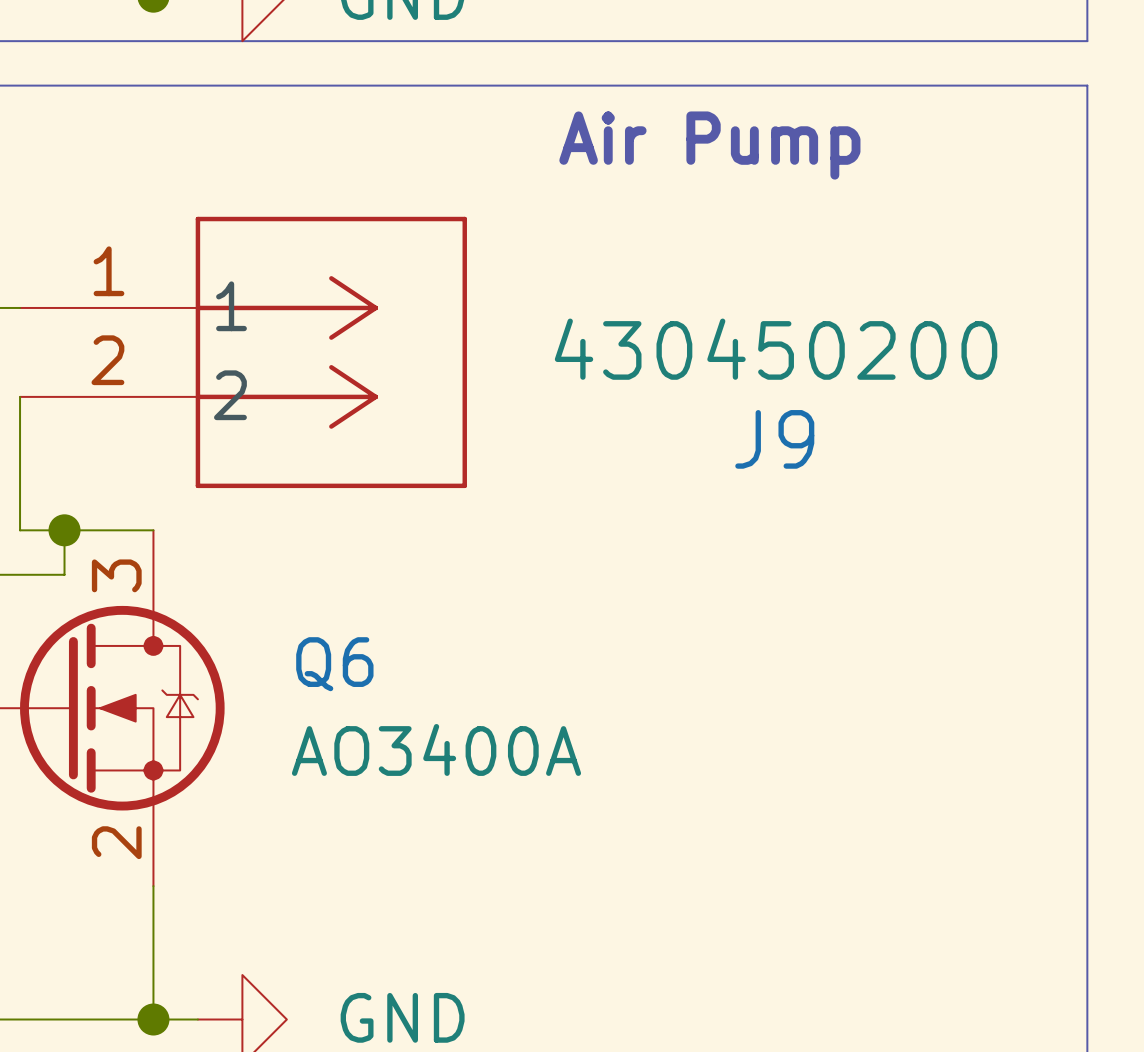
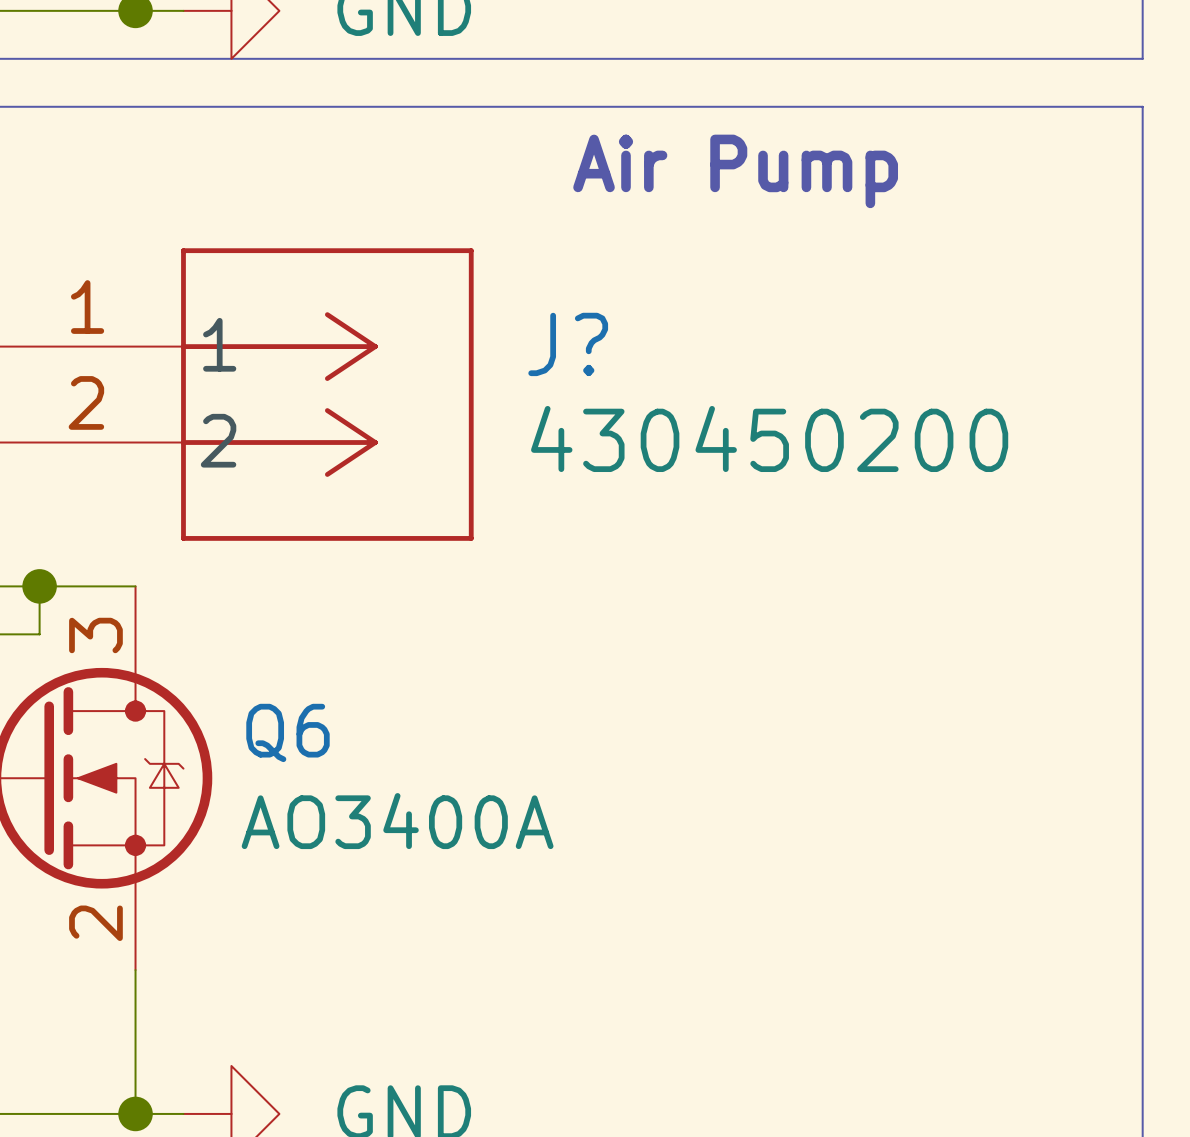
J9 value position: 430450200 (776, 349) -> 430450200 (769, 438)
J9 name: J9 (774, 439) -> J? (568, 344)
Q6 name position: Q6 (334, 664) -> Q6 (287, 732)
Q6 value position: AO3400A (436, 749) -> AO3400A (397, 821)

